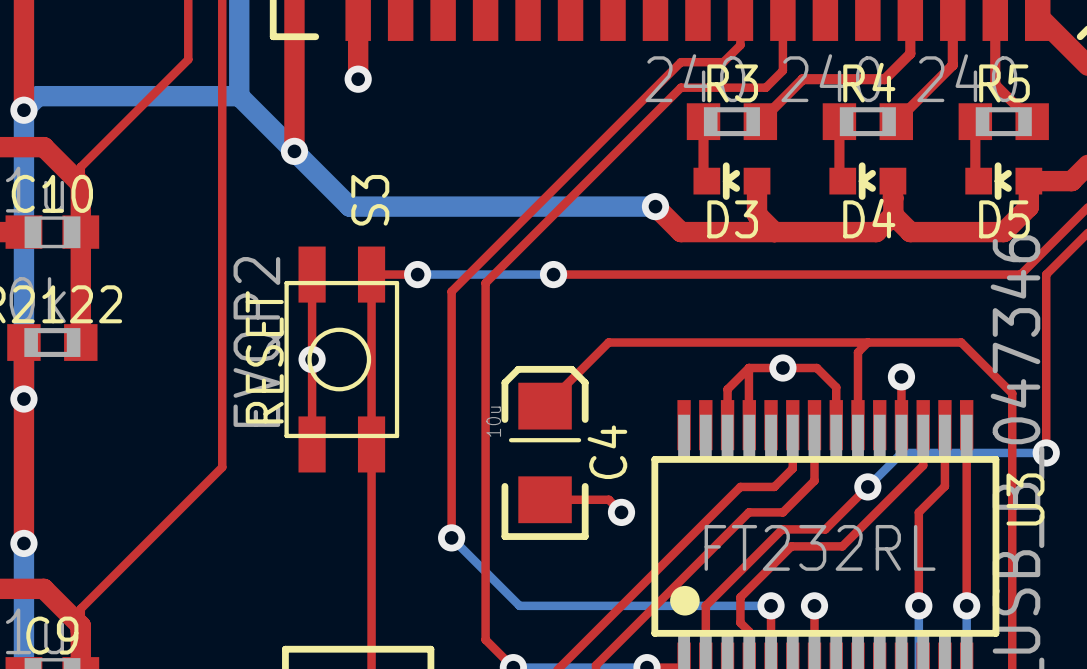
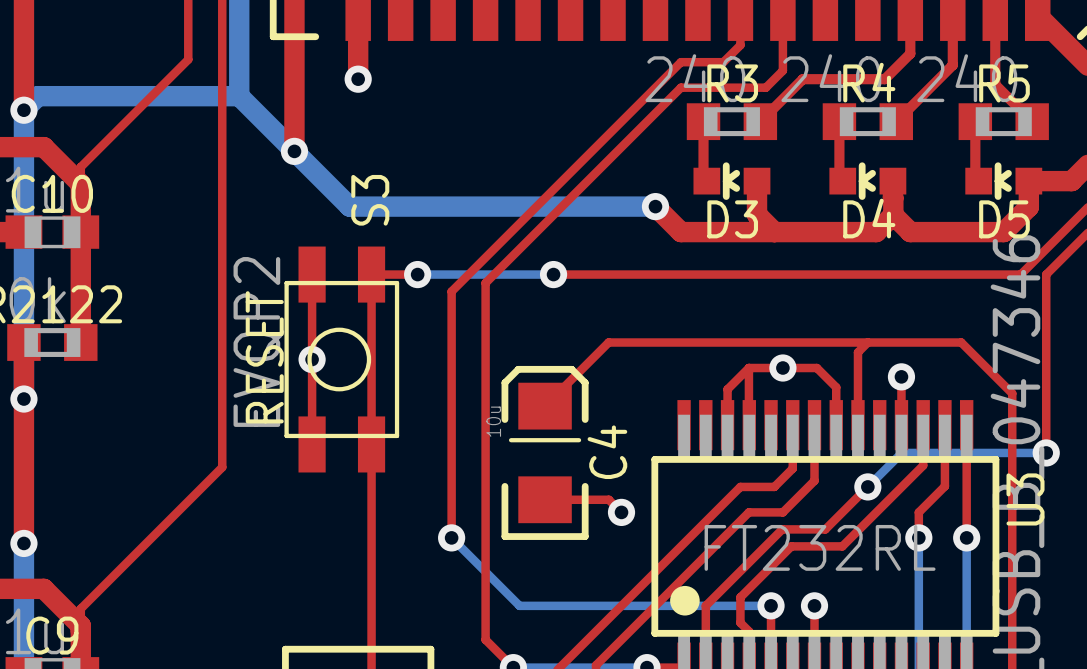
top track: (918, 537) (918, 605) -> none
bottom track: none -> (918, 537) (918, 605)
via: none -> (918, 537)
top track: (966, 537) (966, 605) -> none
bottom track: none -> (966, 537) (966, 605)
via: none -> (966, 537)
via: (918, 605) -> none
via: (966, 605) -> none

